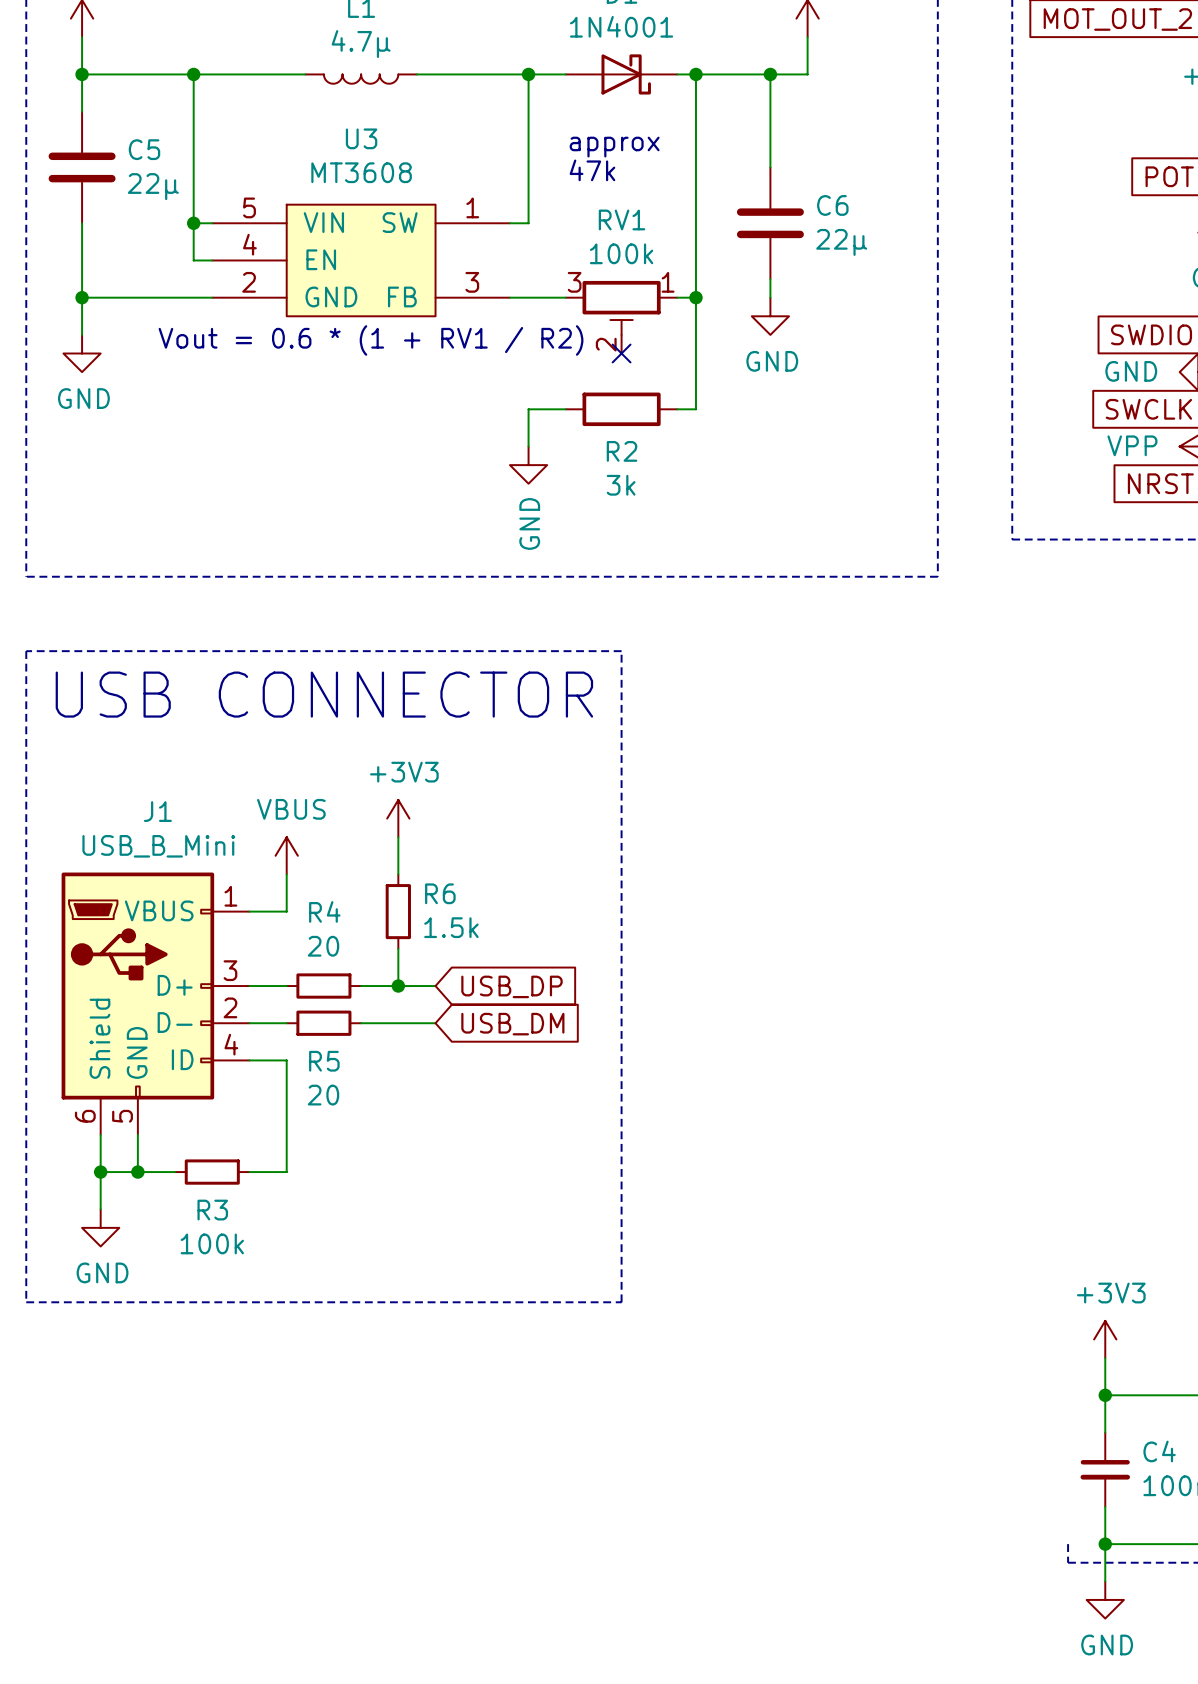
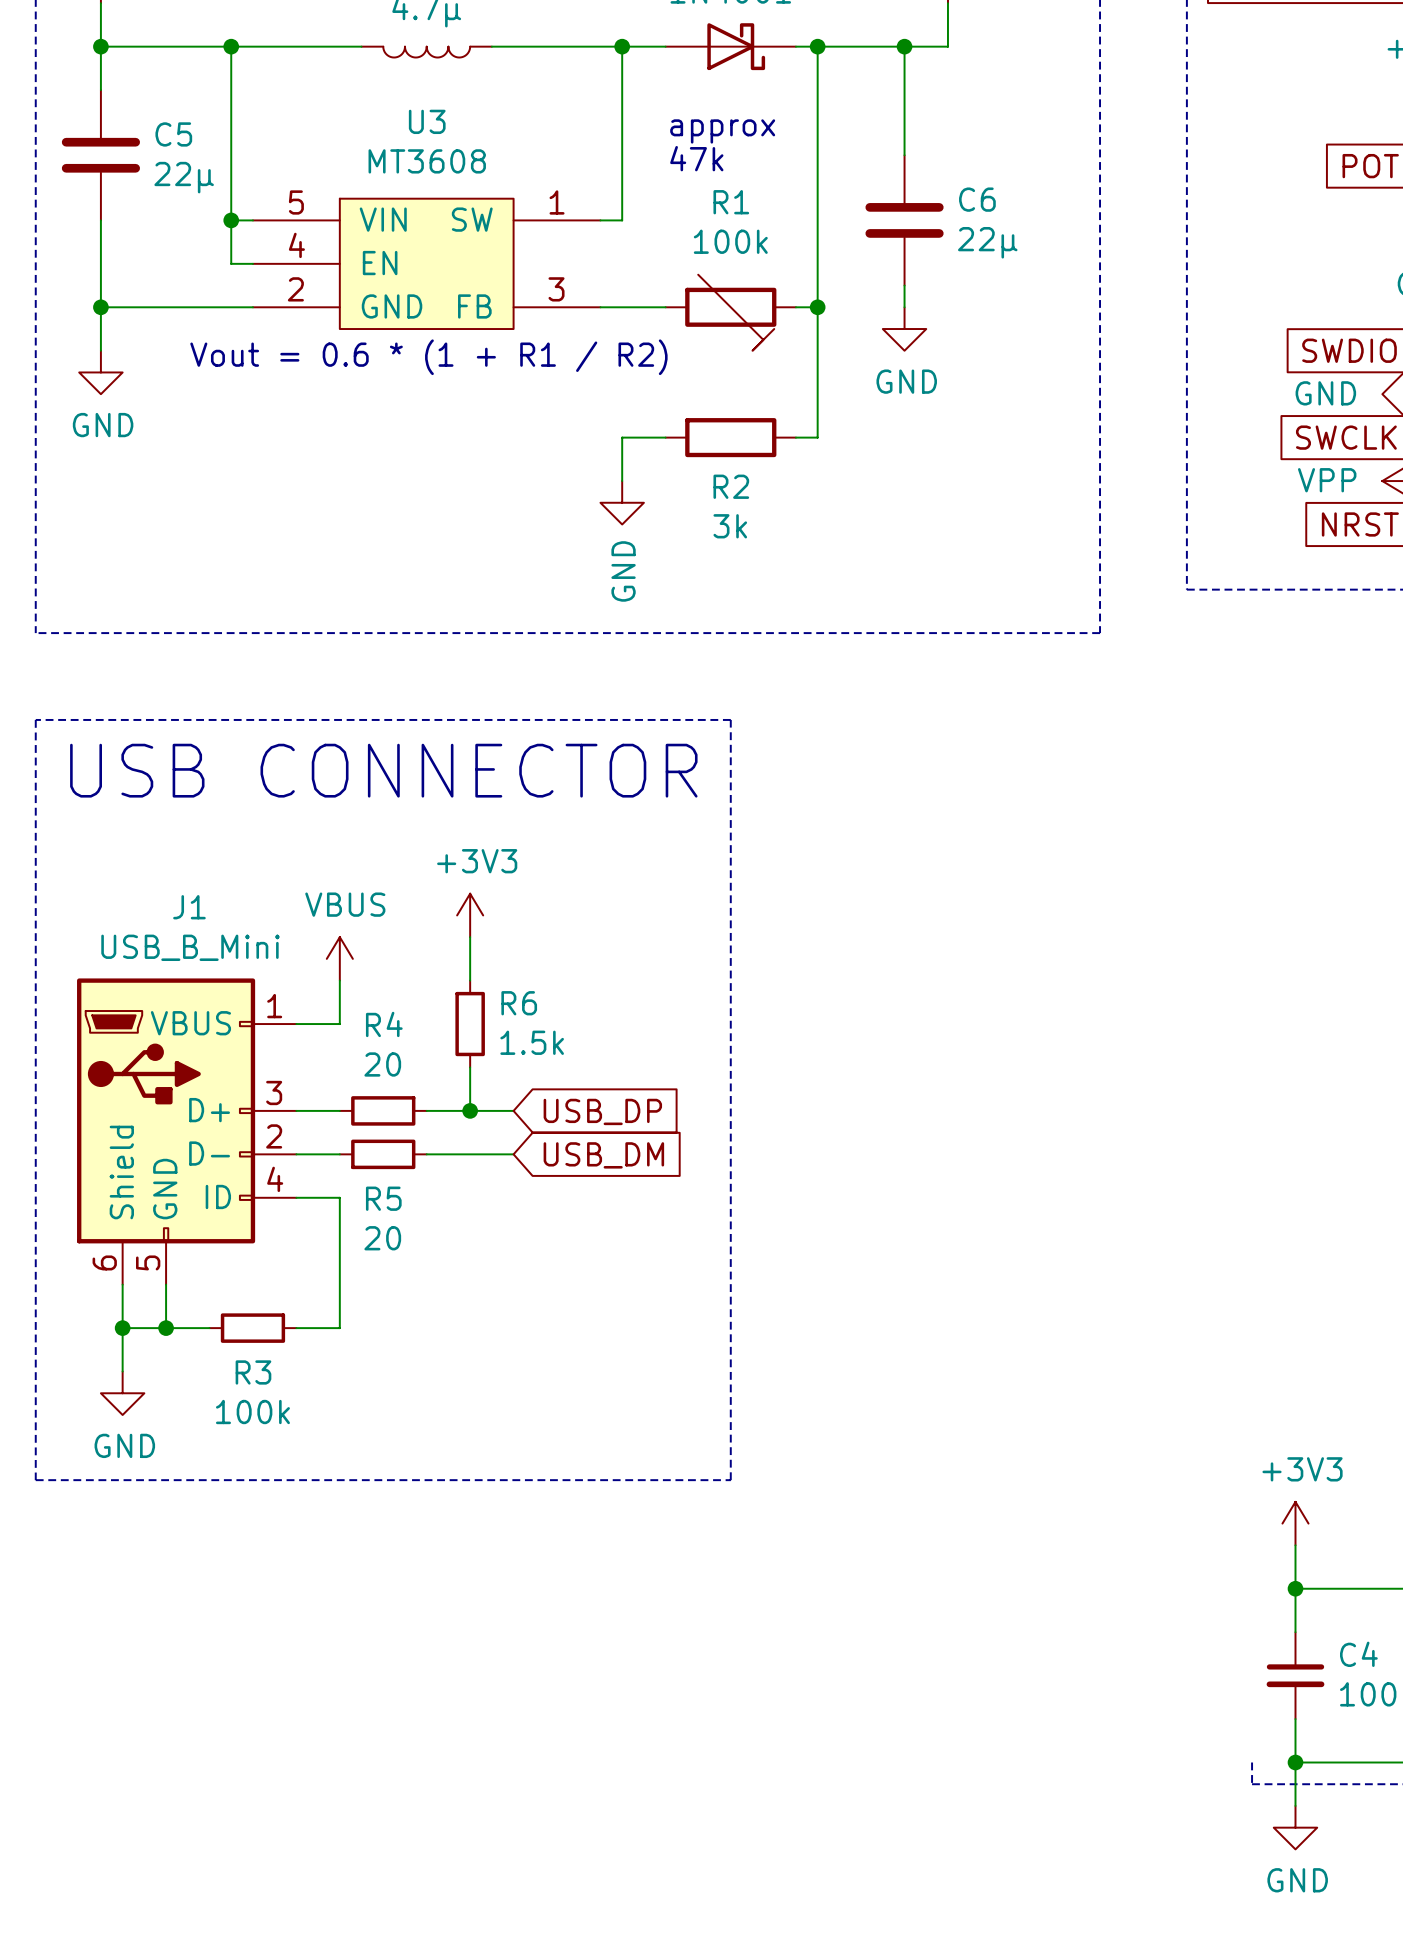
R1: none -> 100k (730, 312)
RV1: 100k (621, 317) -> none
text: Vout = 0.6 * (1 + RV1 / R2) (371, 340) -> Vout = 0.6 * (1 + R1 / R2) (428, 357)
no-connect mark: (621, 353) -> none

